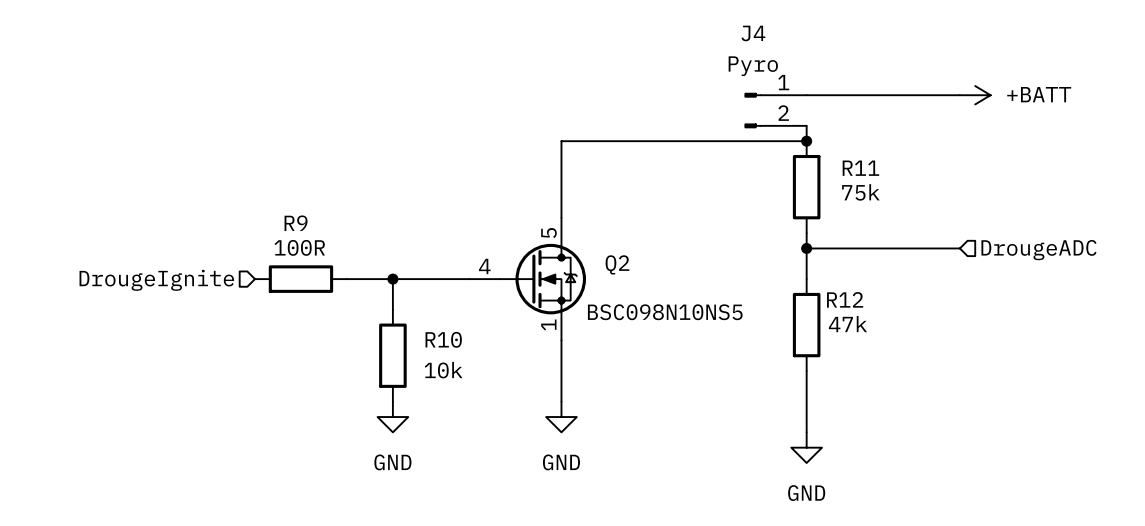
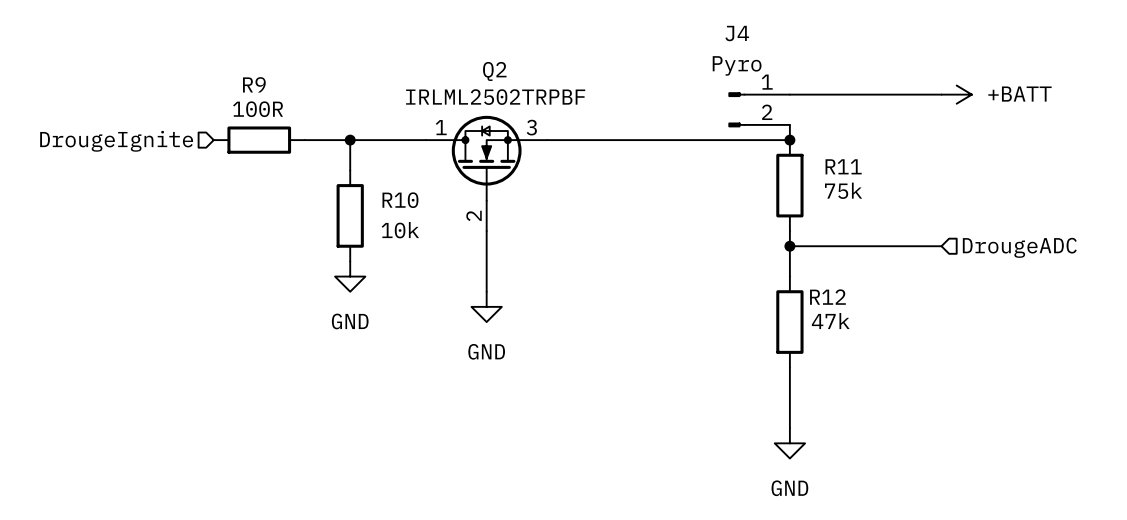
junction: none -> (350, 140)
wire: (561, 141) (561, 217) -> none
Q2 symbol: [469, 217, 586, 341] -> [426, 115, 548, 232]
Q2 name position: Q2 (617, 264) -> Q2 (494, 71)
R9 position: (300, 279) -> (259, 140)
wire: (346, 279) (469, 279) -> (304, 140) (426, 140)
power symbol: none -> GND (350, 276)
wire: (392, 279) (392, 309) -> (350, 140) (350, 170)
junction: (392, 279) -> none
hierarchical label position: DrougeIgnite (156, 280) -> DrougeIgnite (116, 141)
power symbol: none -> GND (486, 306)
Q2 value: BSC098N10NS5 (665, 312) -> IRLML2502TRPBF (495, 97)
wire: (561, 340) (561, 401) -> (486, 231) (486, 291)
R10 position: (392, 355) -> (350, 215)
power symbol: GND (392, 417) -> none
power symbol: GND (561, 417) -> none

